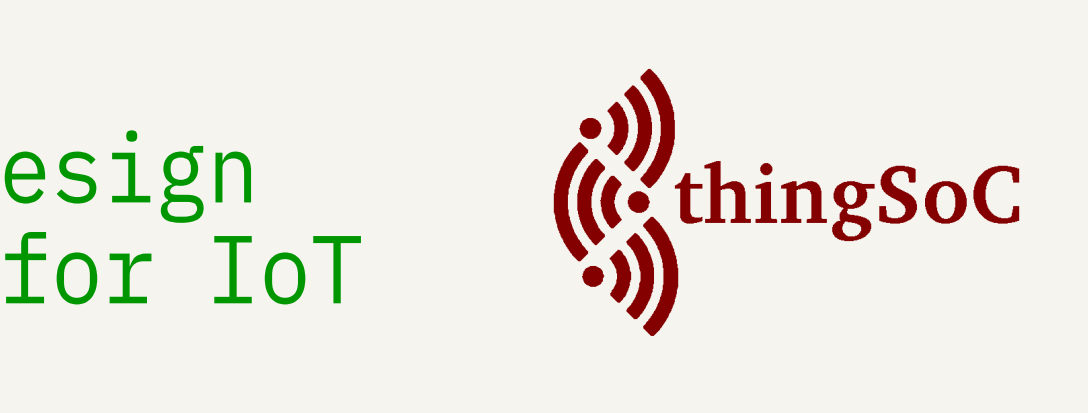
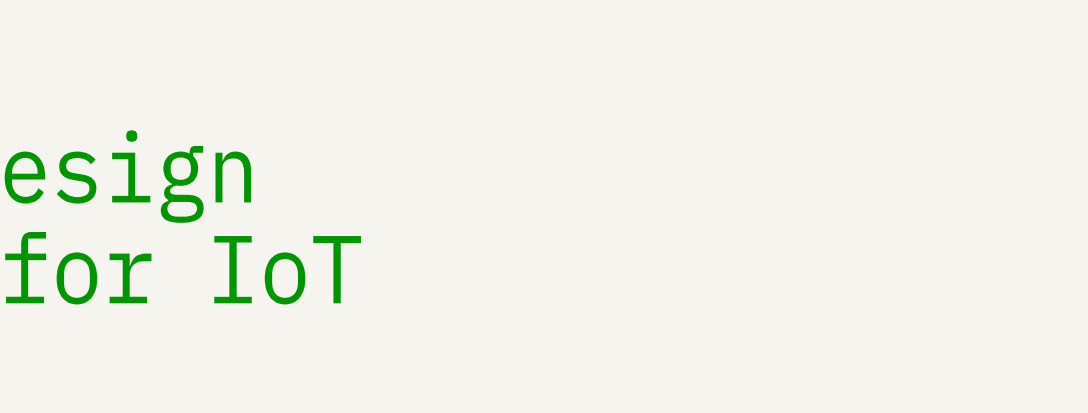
part: (786, 202) -> none

